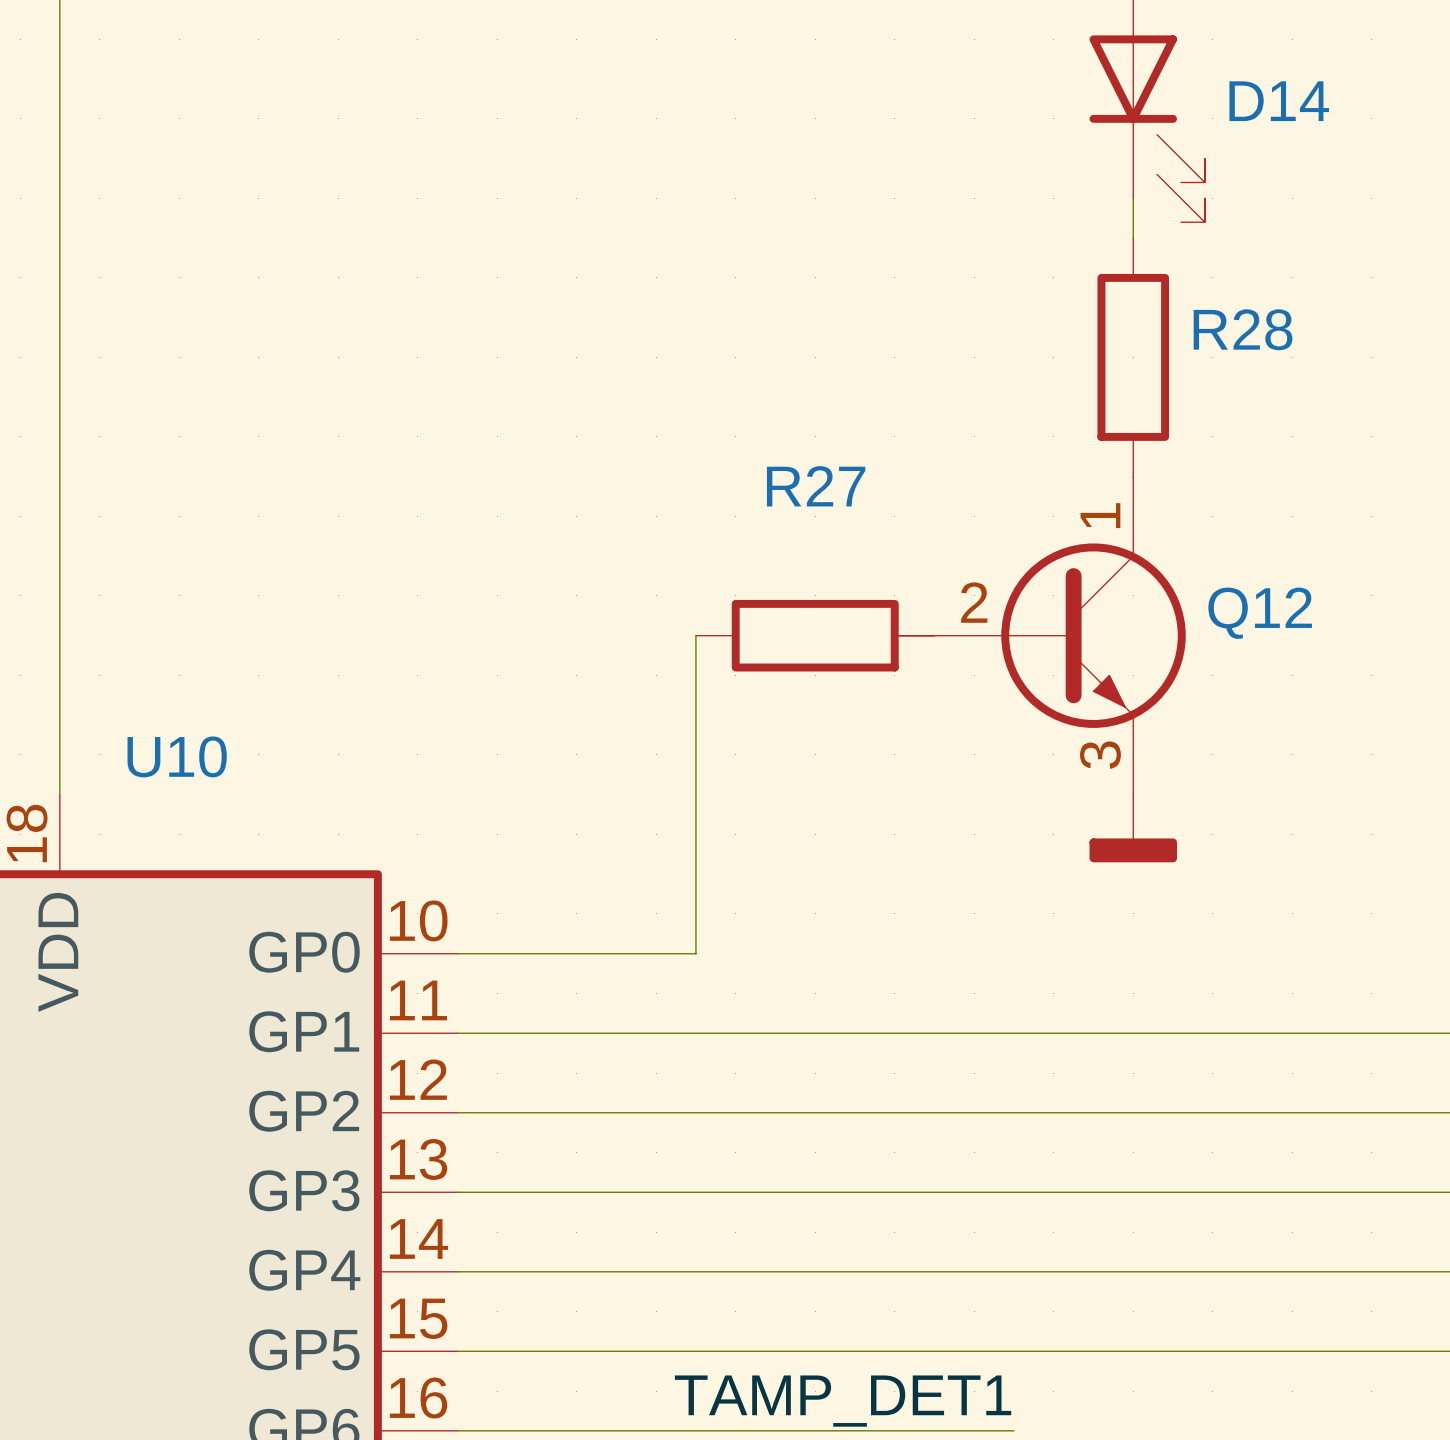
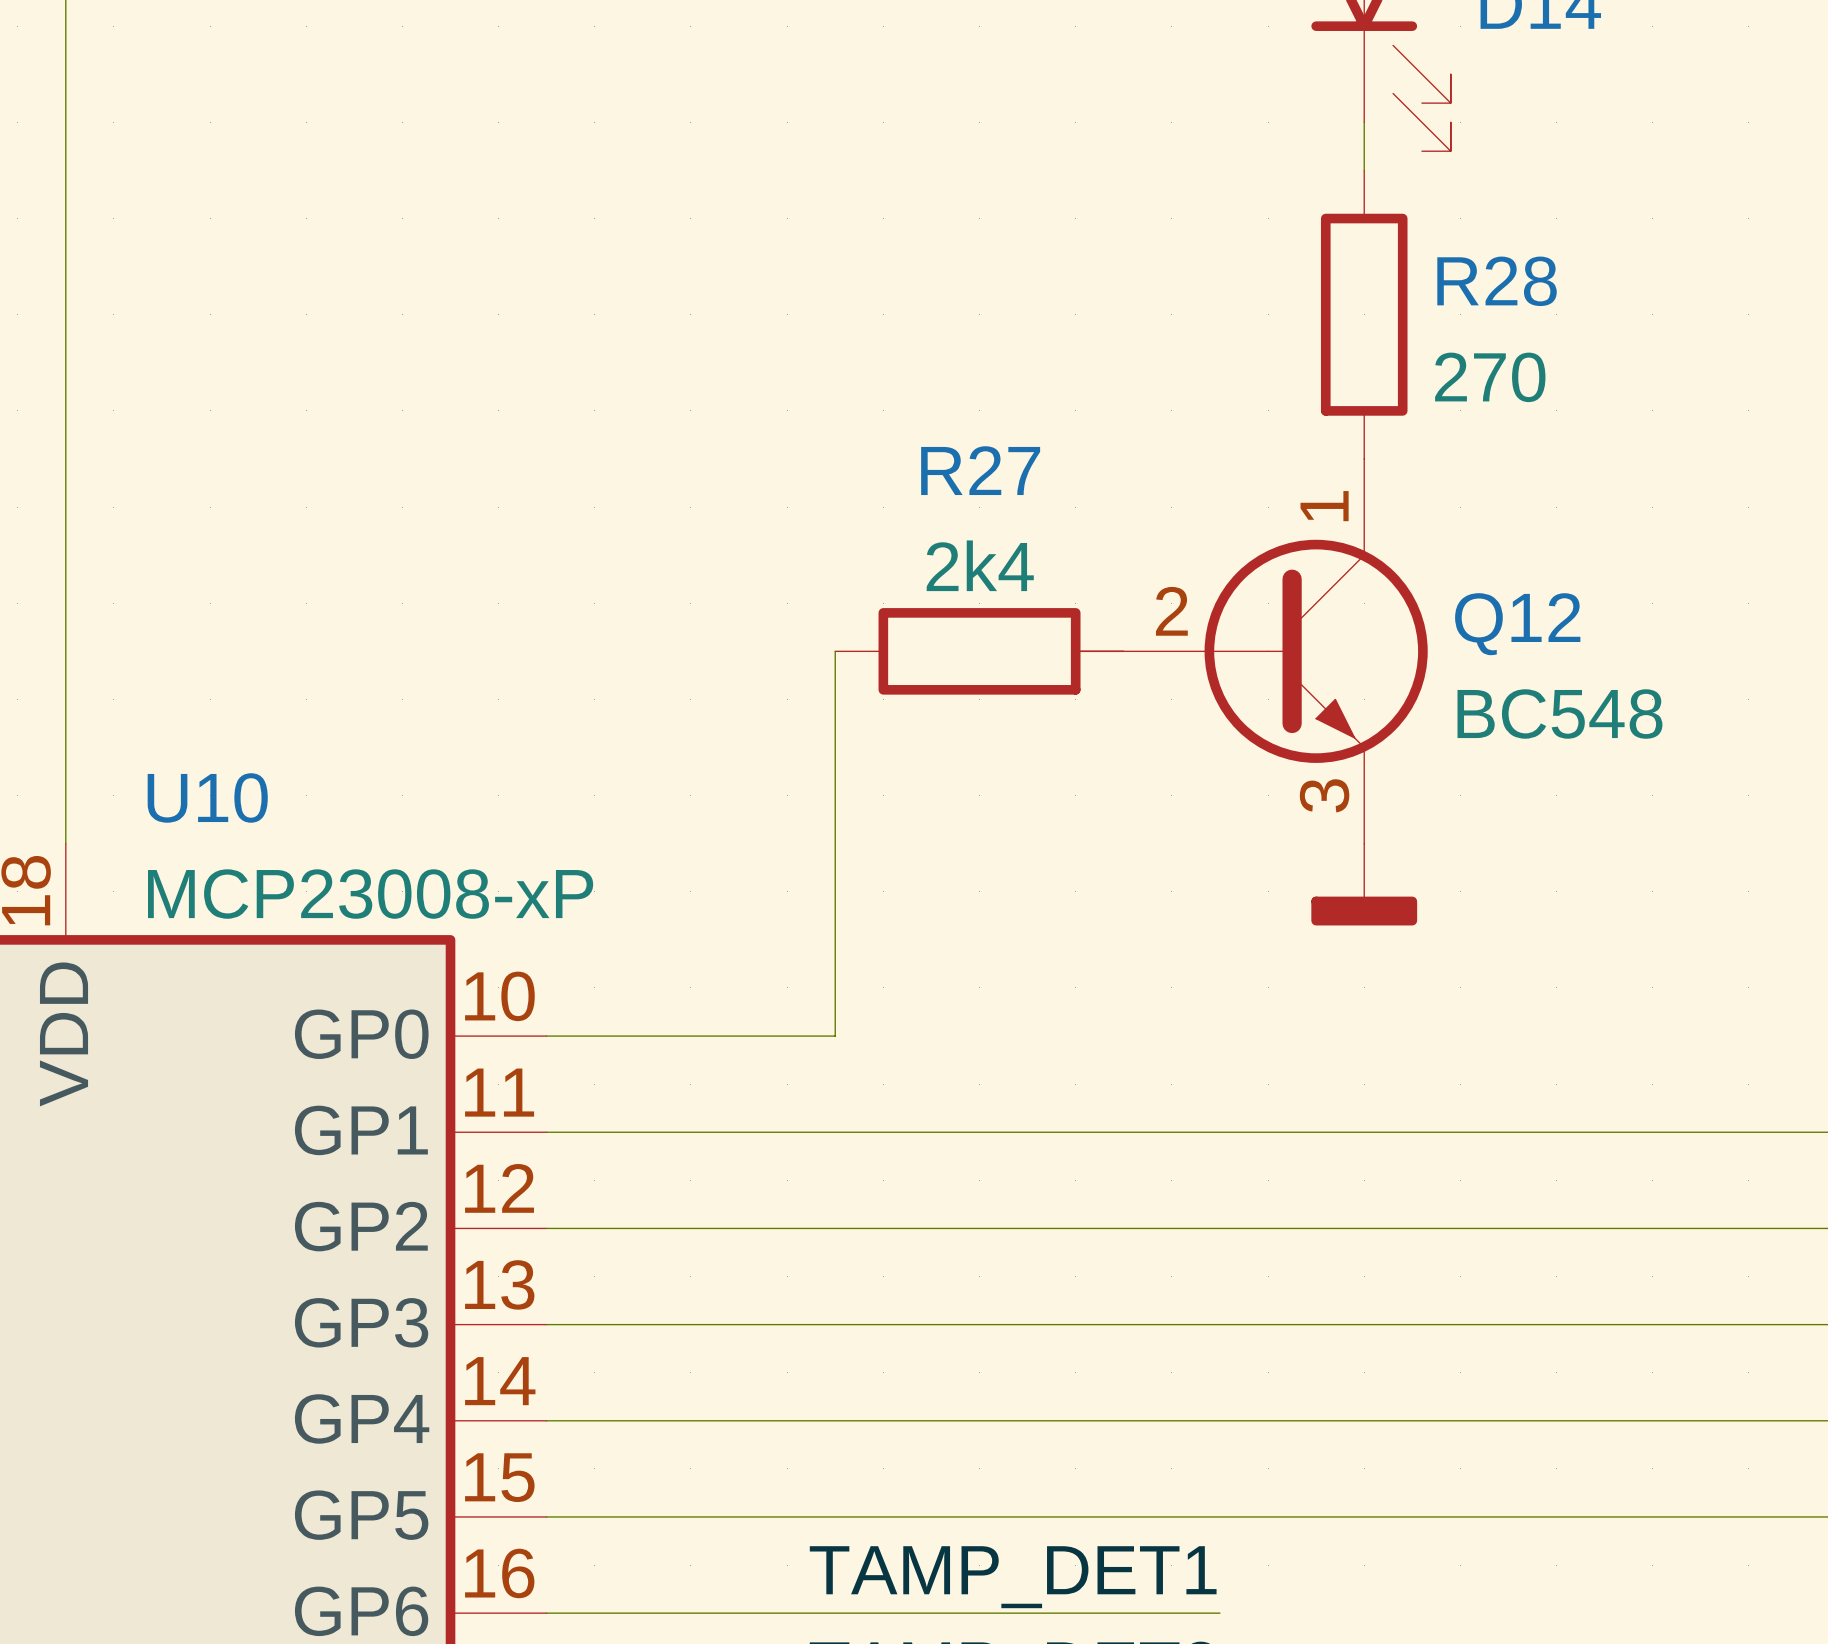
R28 value: none -> 270 (1490, 377)
R27 value: none -> 2k4 (980, 565)
Q12 value: none -> BC548 (1559, 713)
U10 value: none -> MCP23008-xP (370, 894)

